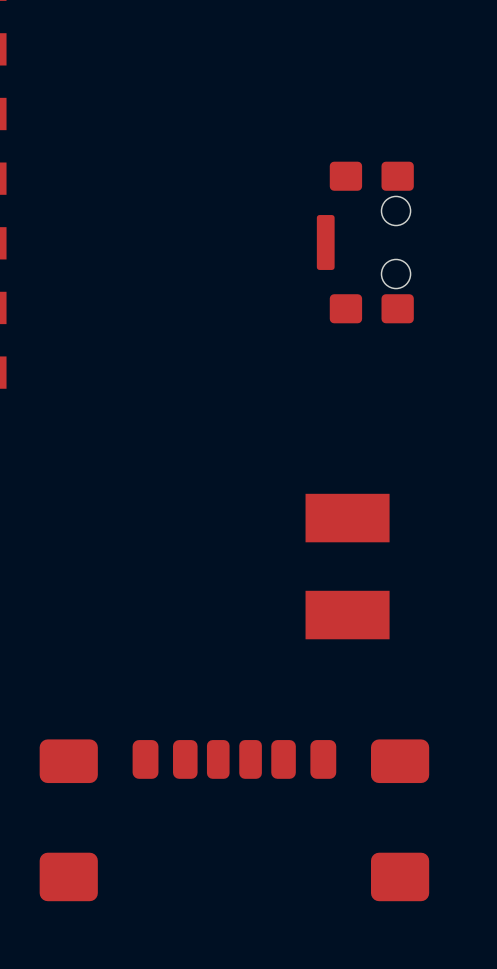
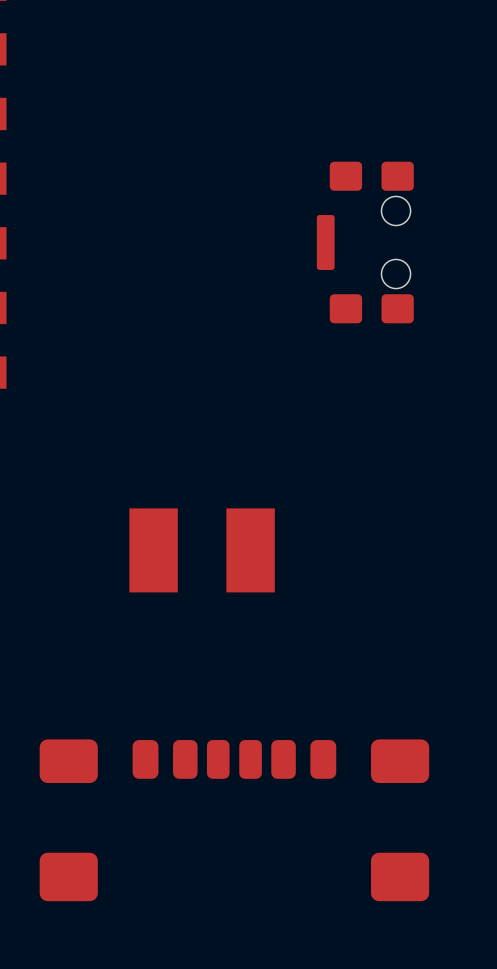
part rotation: 0° (347, 566) -> 90° clockwise (202, 550)
part position: (347, 566) -> (202, 550)

